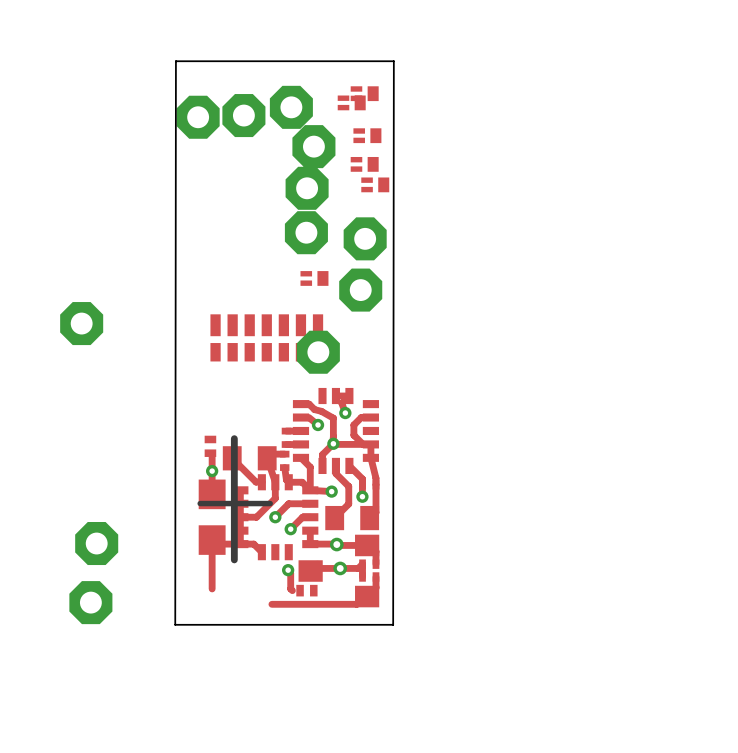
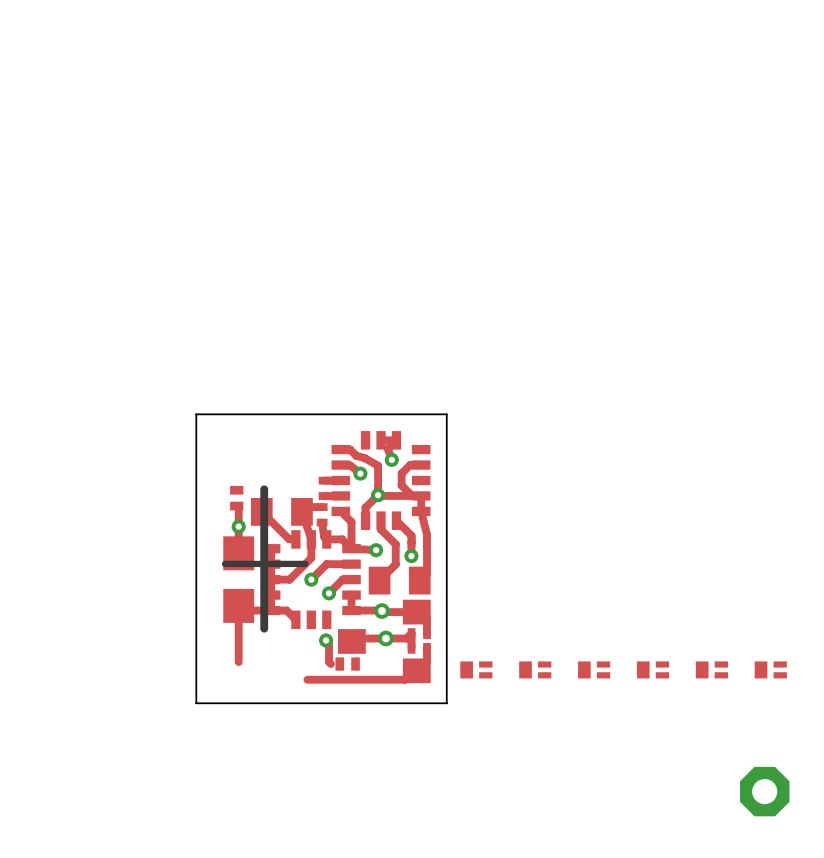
part: (364, 93) -> none
part: (351, 102) -> none
part: (291, 107) -> none
part: (243, 115) -> none
part: (198, 117) -> none
part: (367, 135) -> none
part: (313, 146) -> none
part: (364, 164) -> none
part: (375, 184) -> none
part: (307, 188) -> none
part: (306, 232) -> none
part: (365, 238) -> none
part: (314, 278) -> none
part: (360, 290) -> none
part: (81, 323) -> none
part: (266, 337) -> none
part: (318, 352) -> none
part: (96, 543) -> none
part: none -> (476, 669)
part: none -> (535, 669)
part: none -> (594, 669)
part: none -> (653, 669)
part: none -> (711, 669)
part: none -> (770, 669)
part: (90, 602) -> none
board edge: (393, 624) (393, 61) (175, 61) (175, 624) -> (446, 703) (446, 414) (196, 414) (196, 703)
part: none -> (764, 791)

